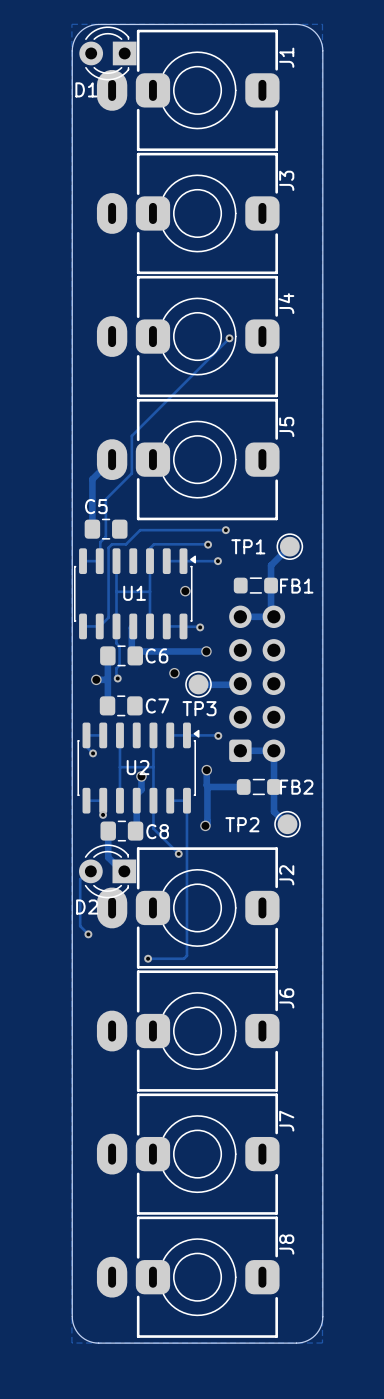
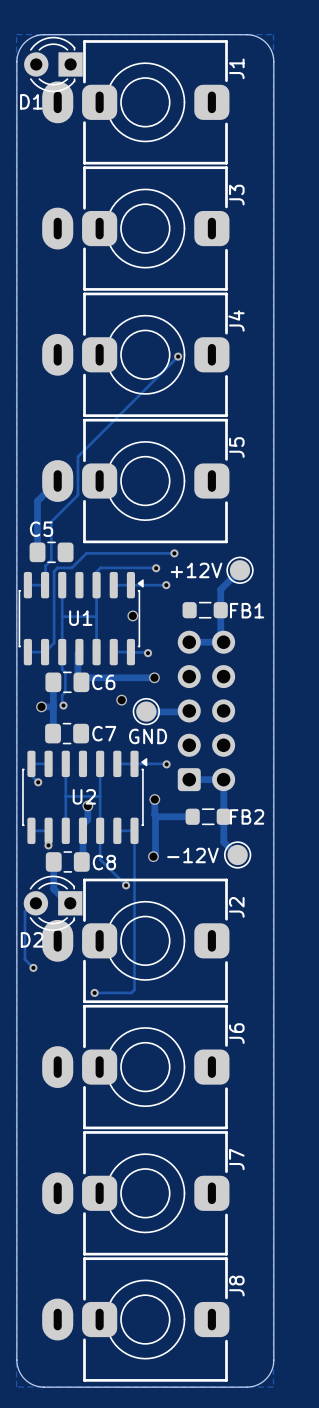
TP1 name: TP1 (248, 546) -> +12V (196, 570)
TP3 name: TP3 (199, 708) -> GND (148, 736)
TP2 name: TP2 (242, 824) -> -12V (192, 855)

